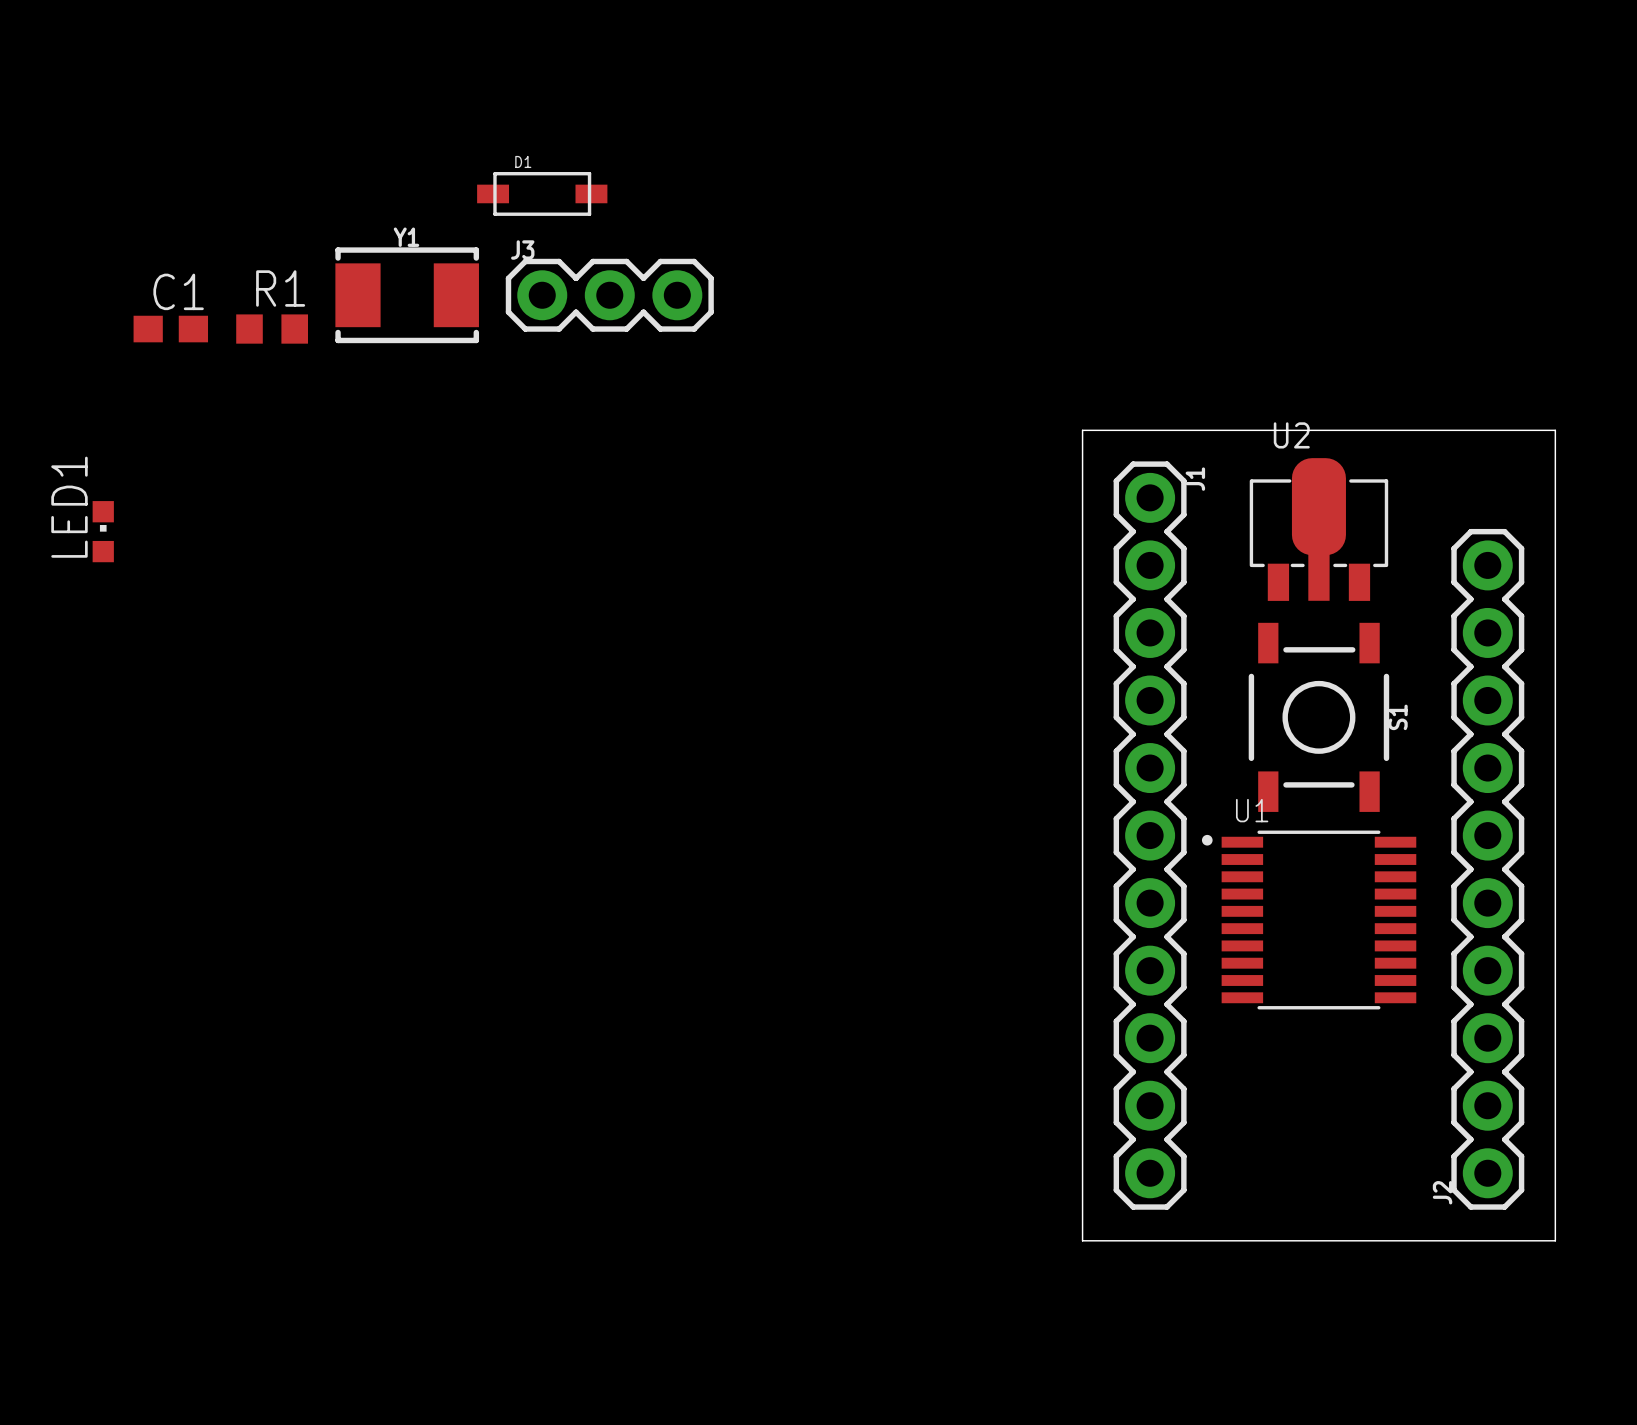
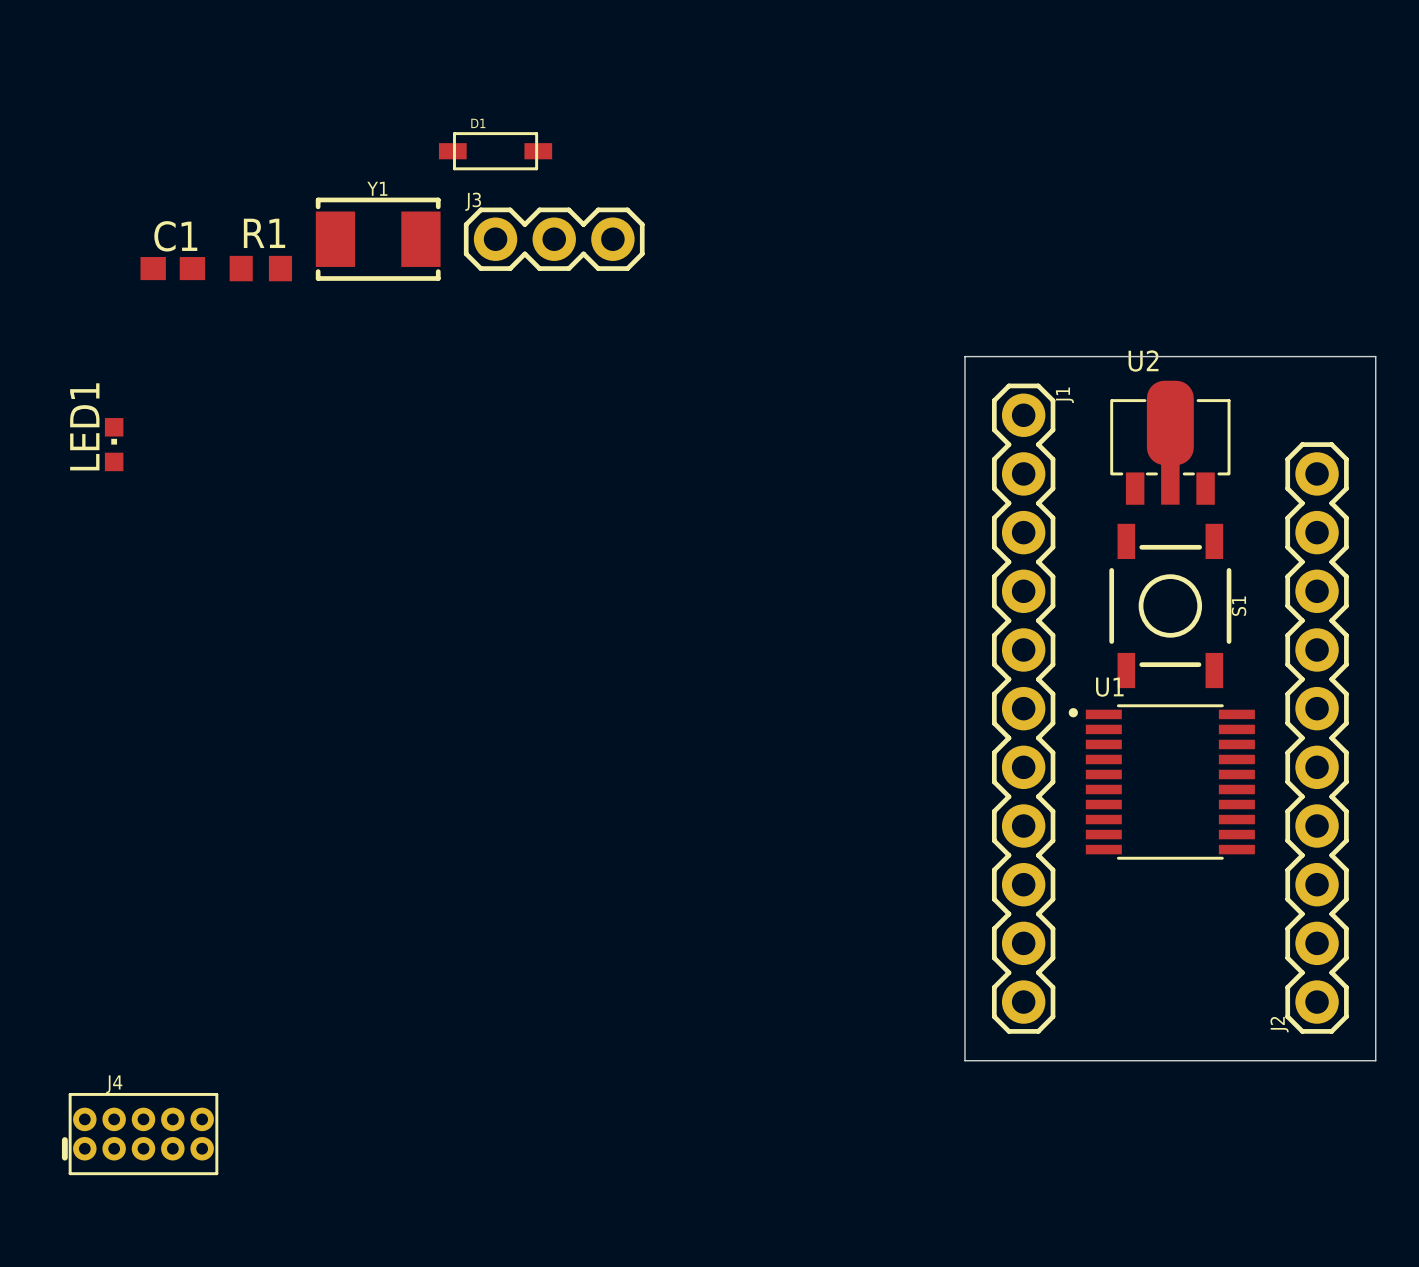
J4: none -> (140, 1134)

